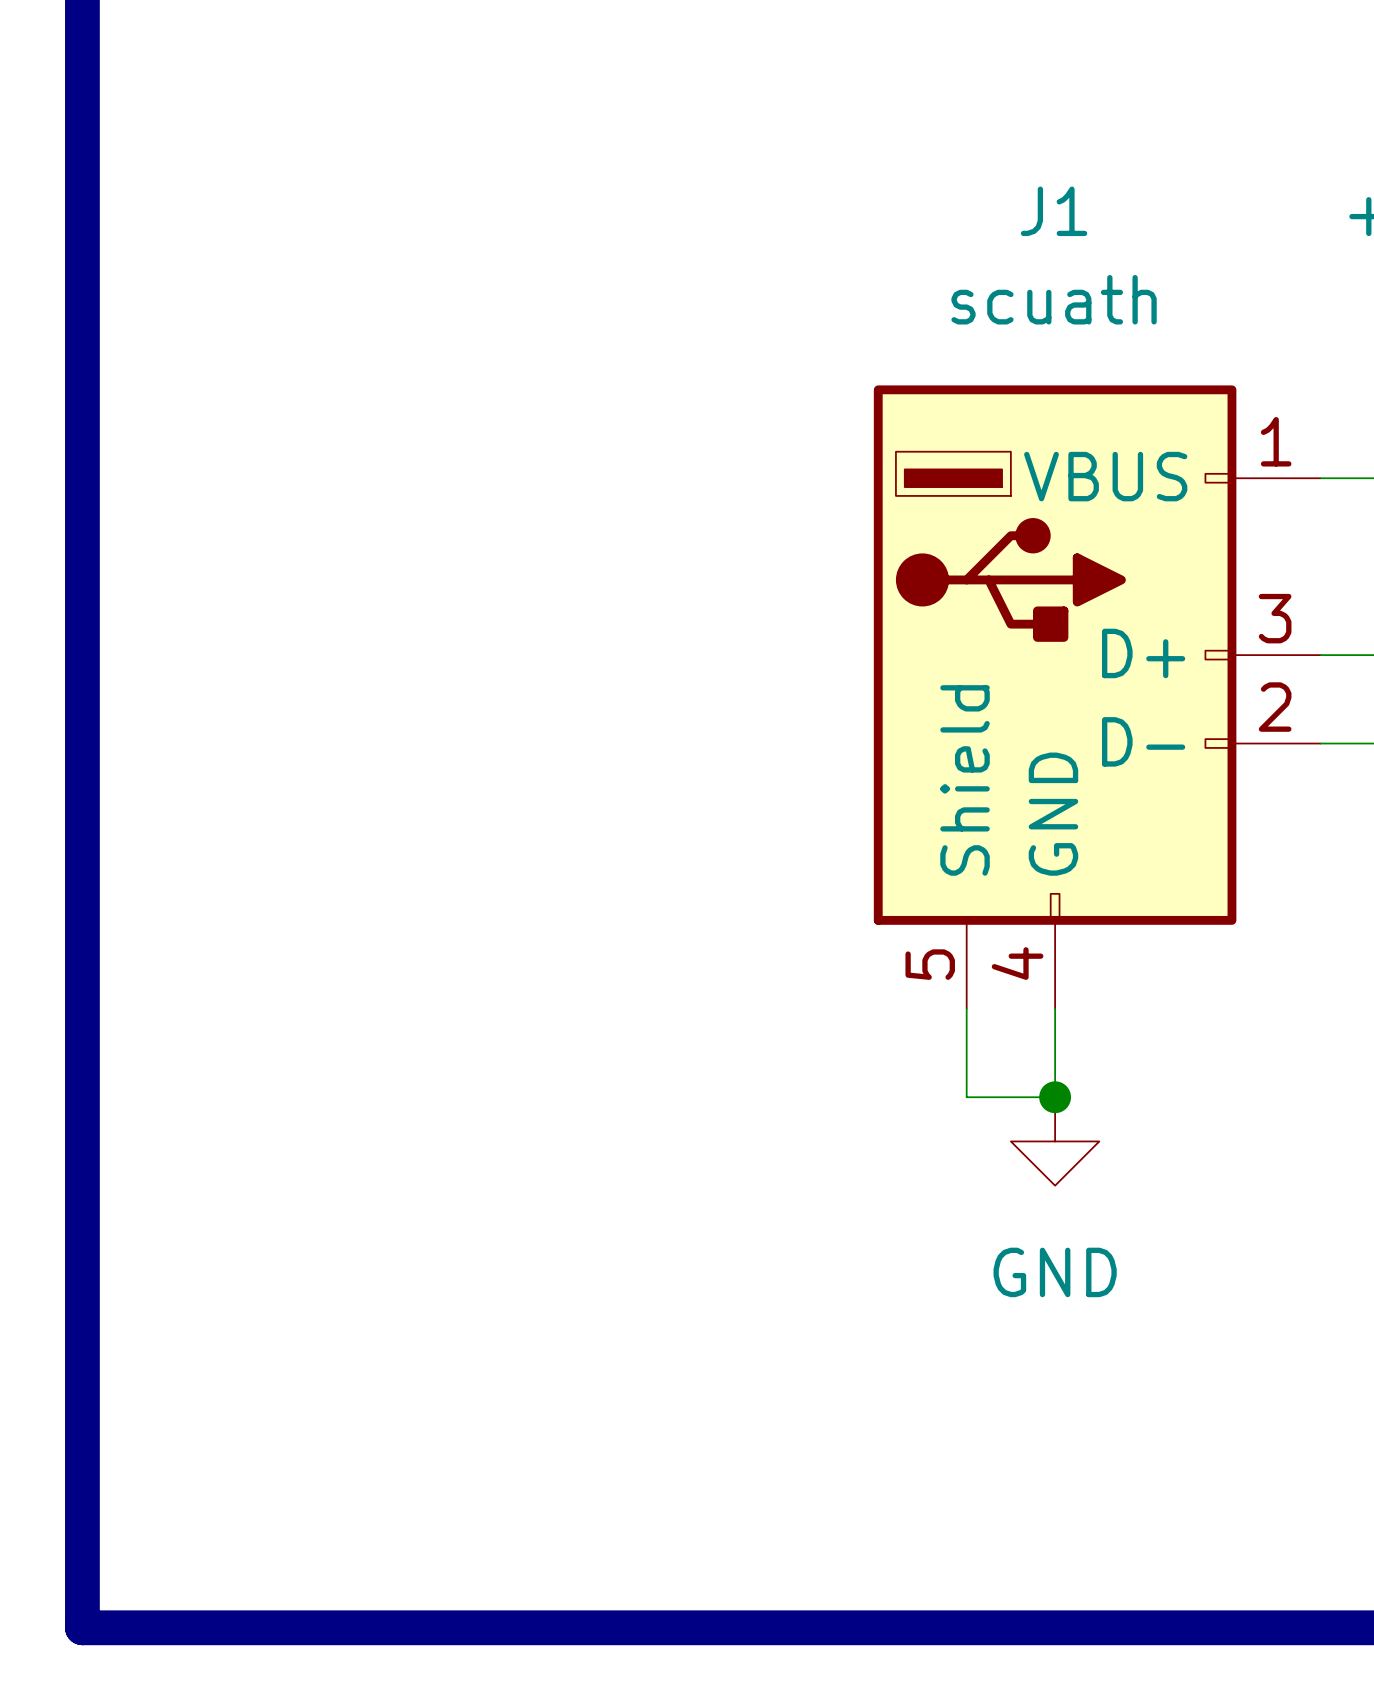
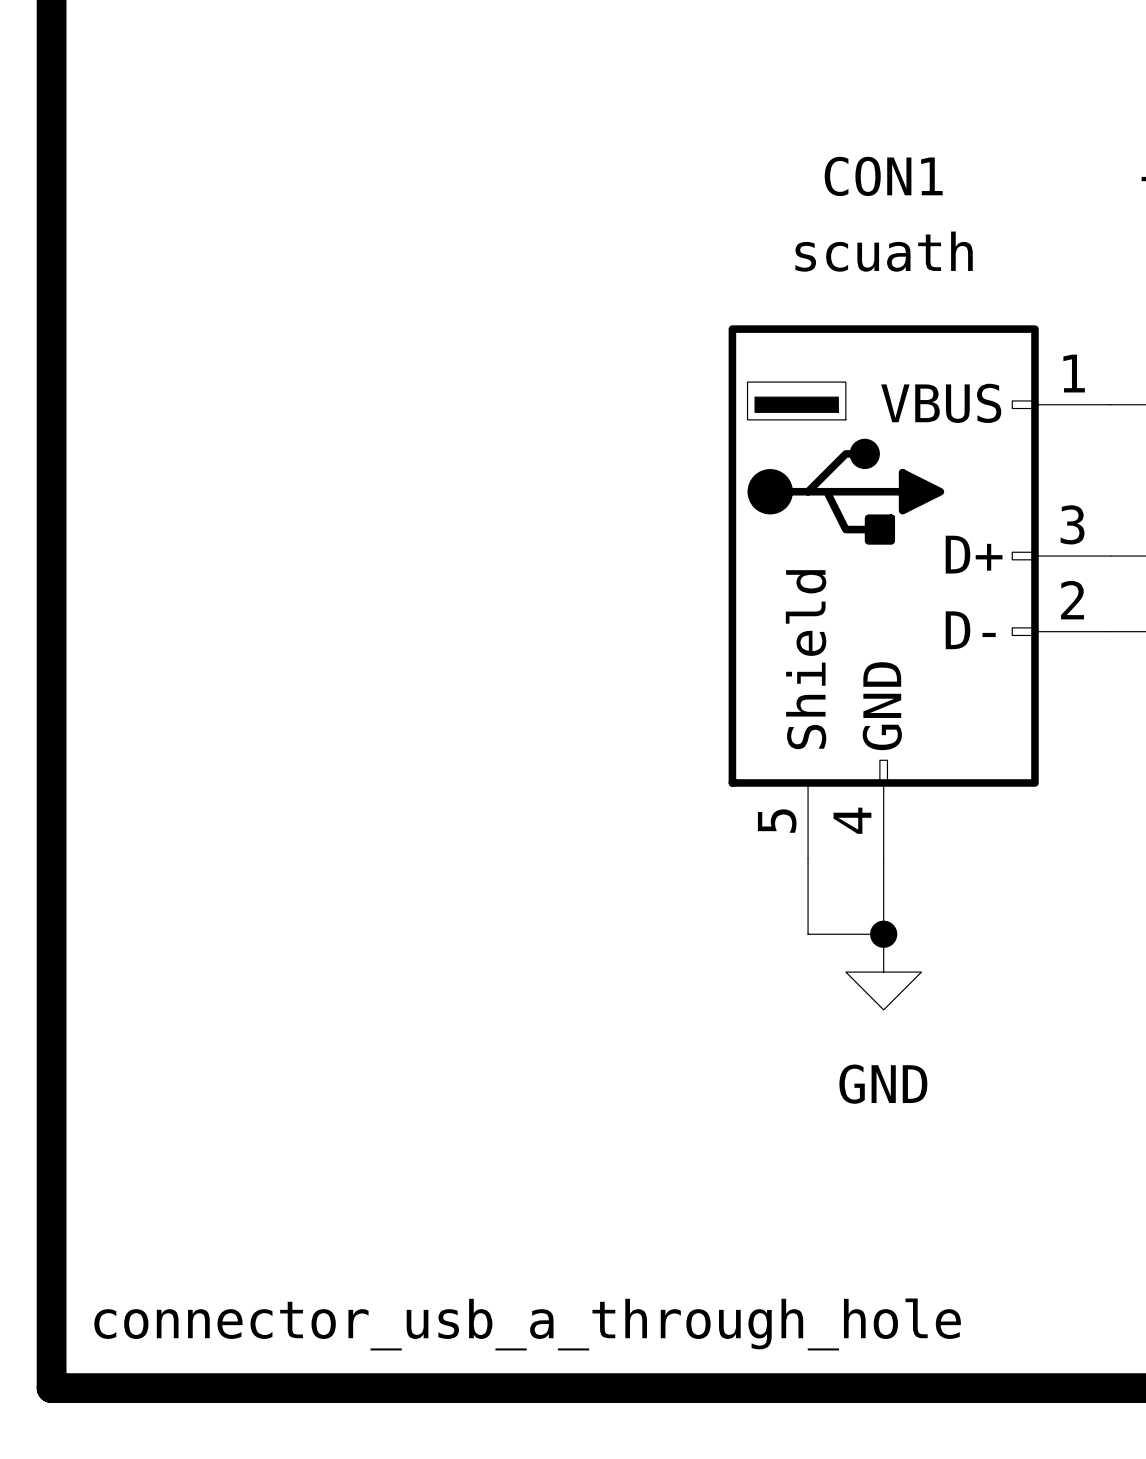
J1 name: J1 (1054, 211) -> CON1 (883, 176)
text: none -> connector_usb_a_through_hole (527, 1324)

